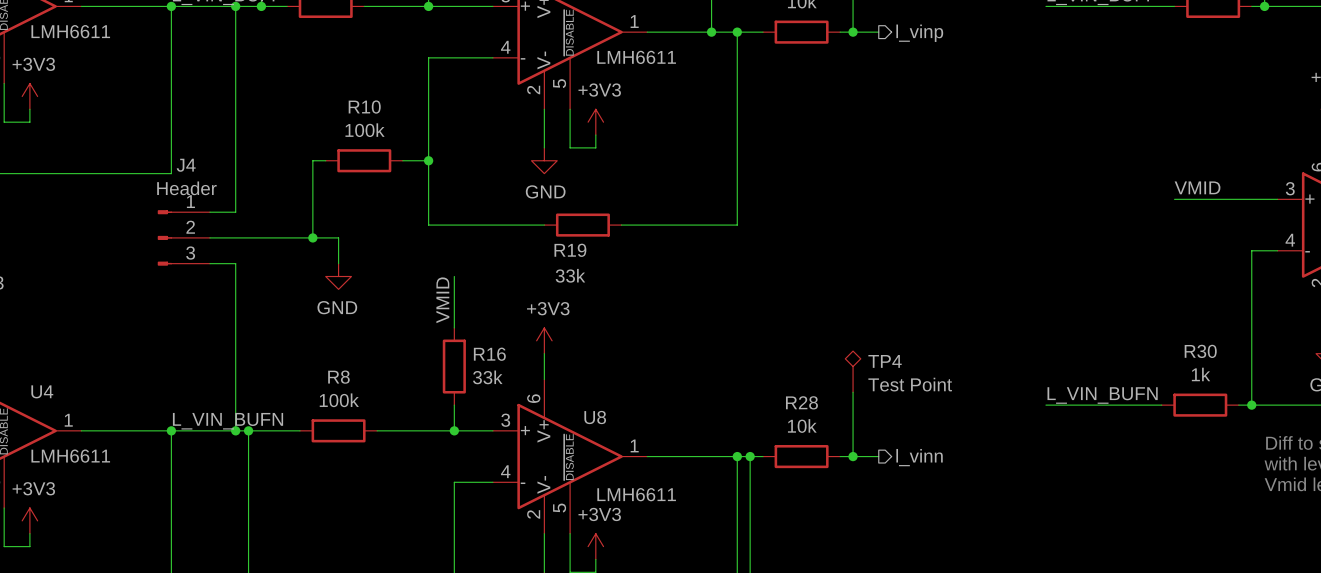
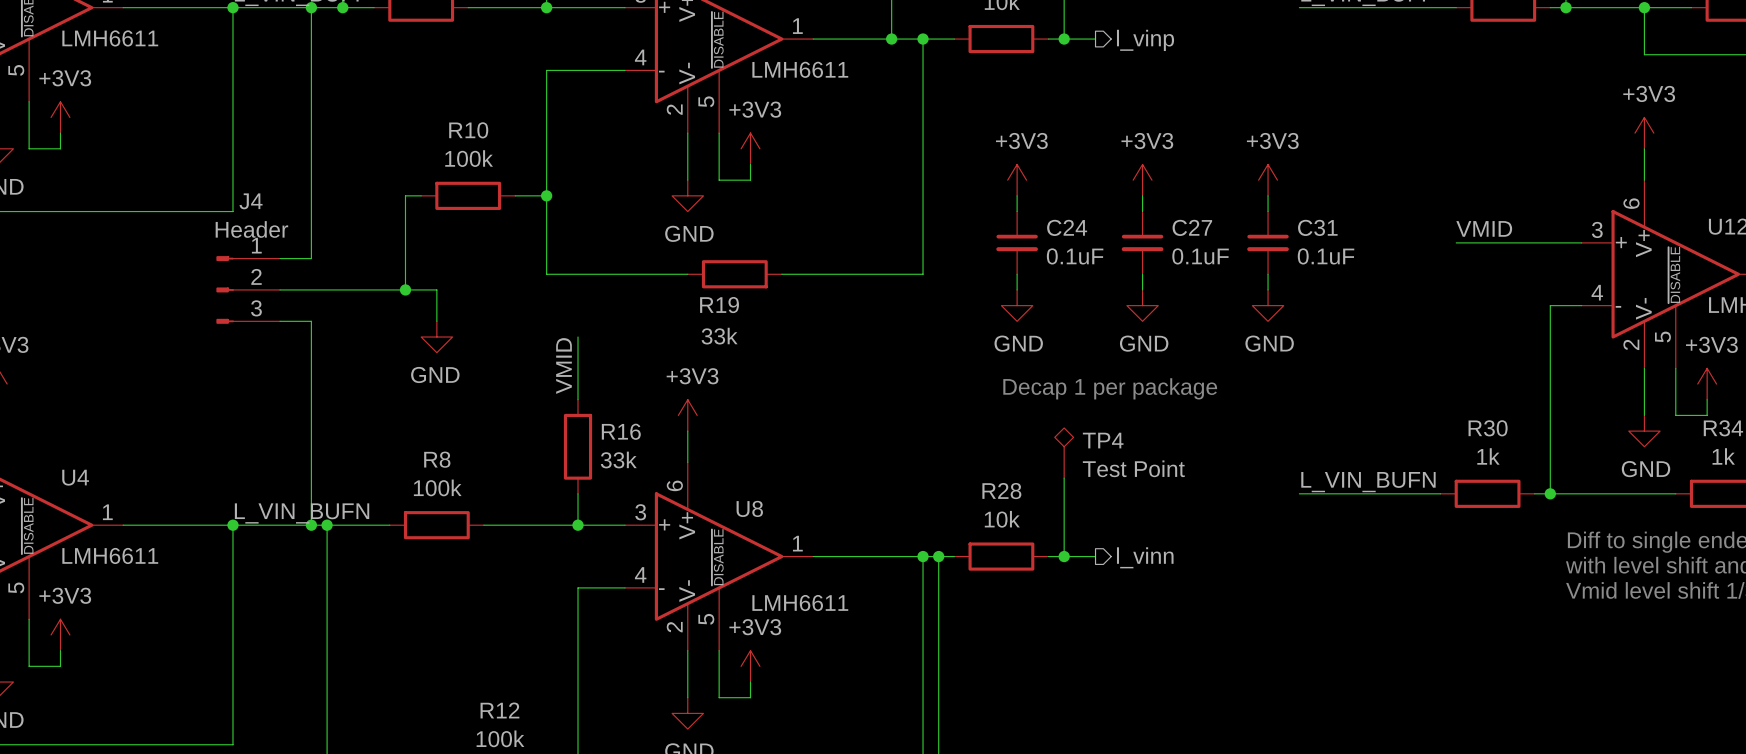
power symbol: none -> +3V3 (1017, 180)
power symbol: none -> +3V3 (1142, 180)
power symbol: none -> +3V3 (1268, 180)
wire: none -> (1017, 195) (1017, 211)
wire: none -> (1142, 195) (1142, 211)
wire: none -> (1268, 195) (1268, 211)
C24: none -> 0.1uF (1017, 242)
C27: none -> 0.1uF (1142, 242)
C31: none -> 0.1uF (1268, 242)
wire: none -> (1017, 274) (1017, 289)
wire: none -> (1142, 274) (1142, 289)
wire: none -> (1268, 274) (1268, 289)
power symbol: none -> GND (1017, 305)
power symbol: none -> GND (1142, 305)
power symbol: none -> GND (1268, 305)
text: none -> Decap 1 per package (1110, 388)

